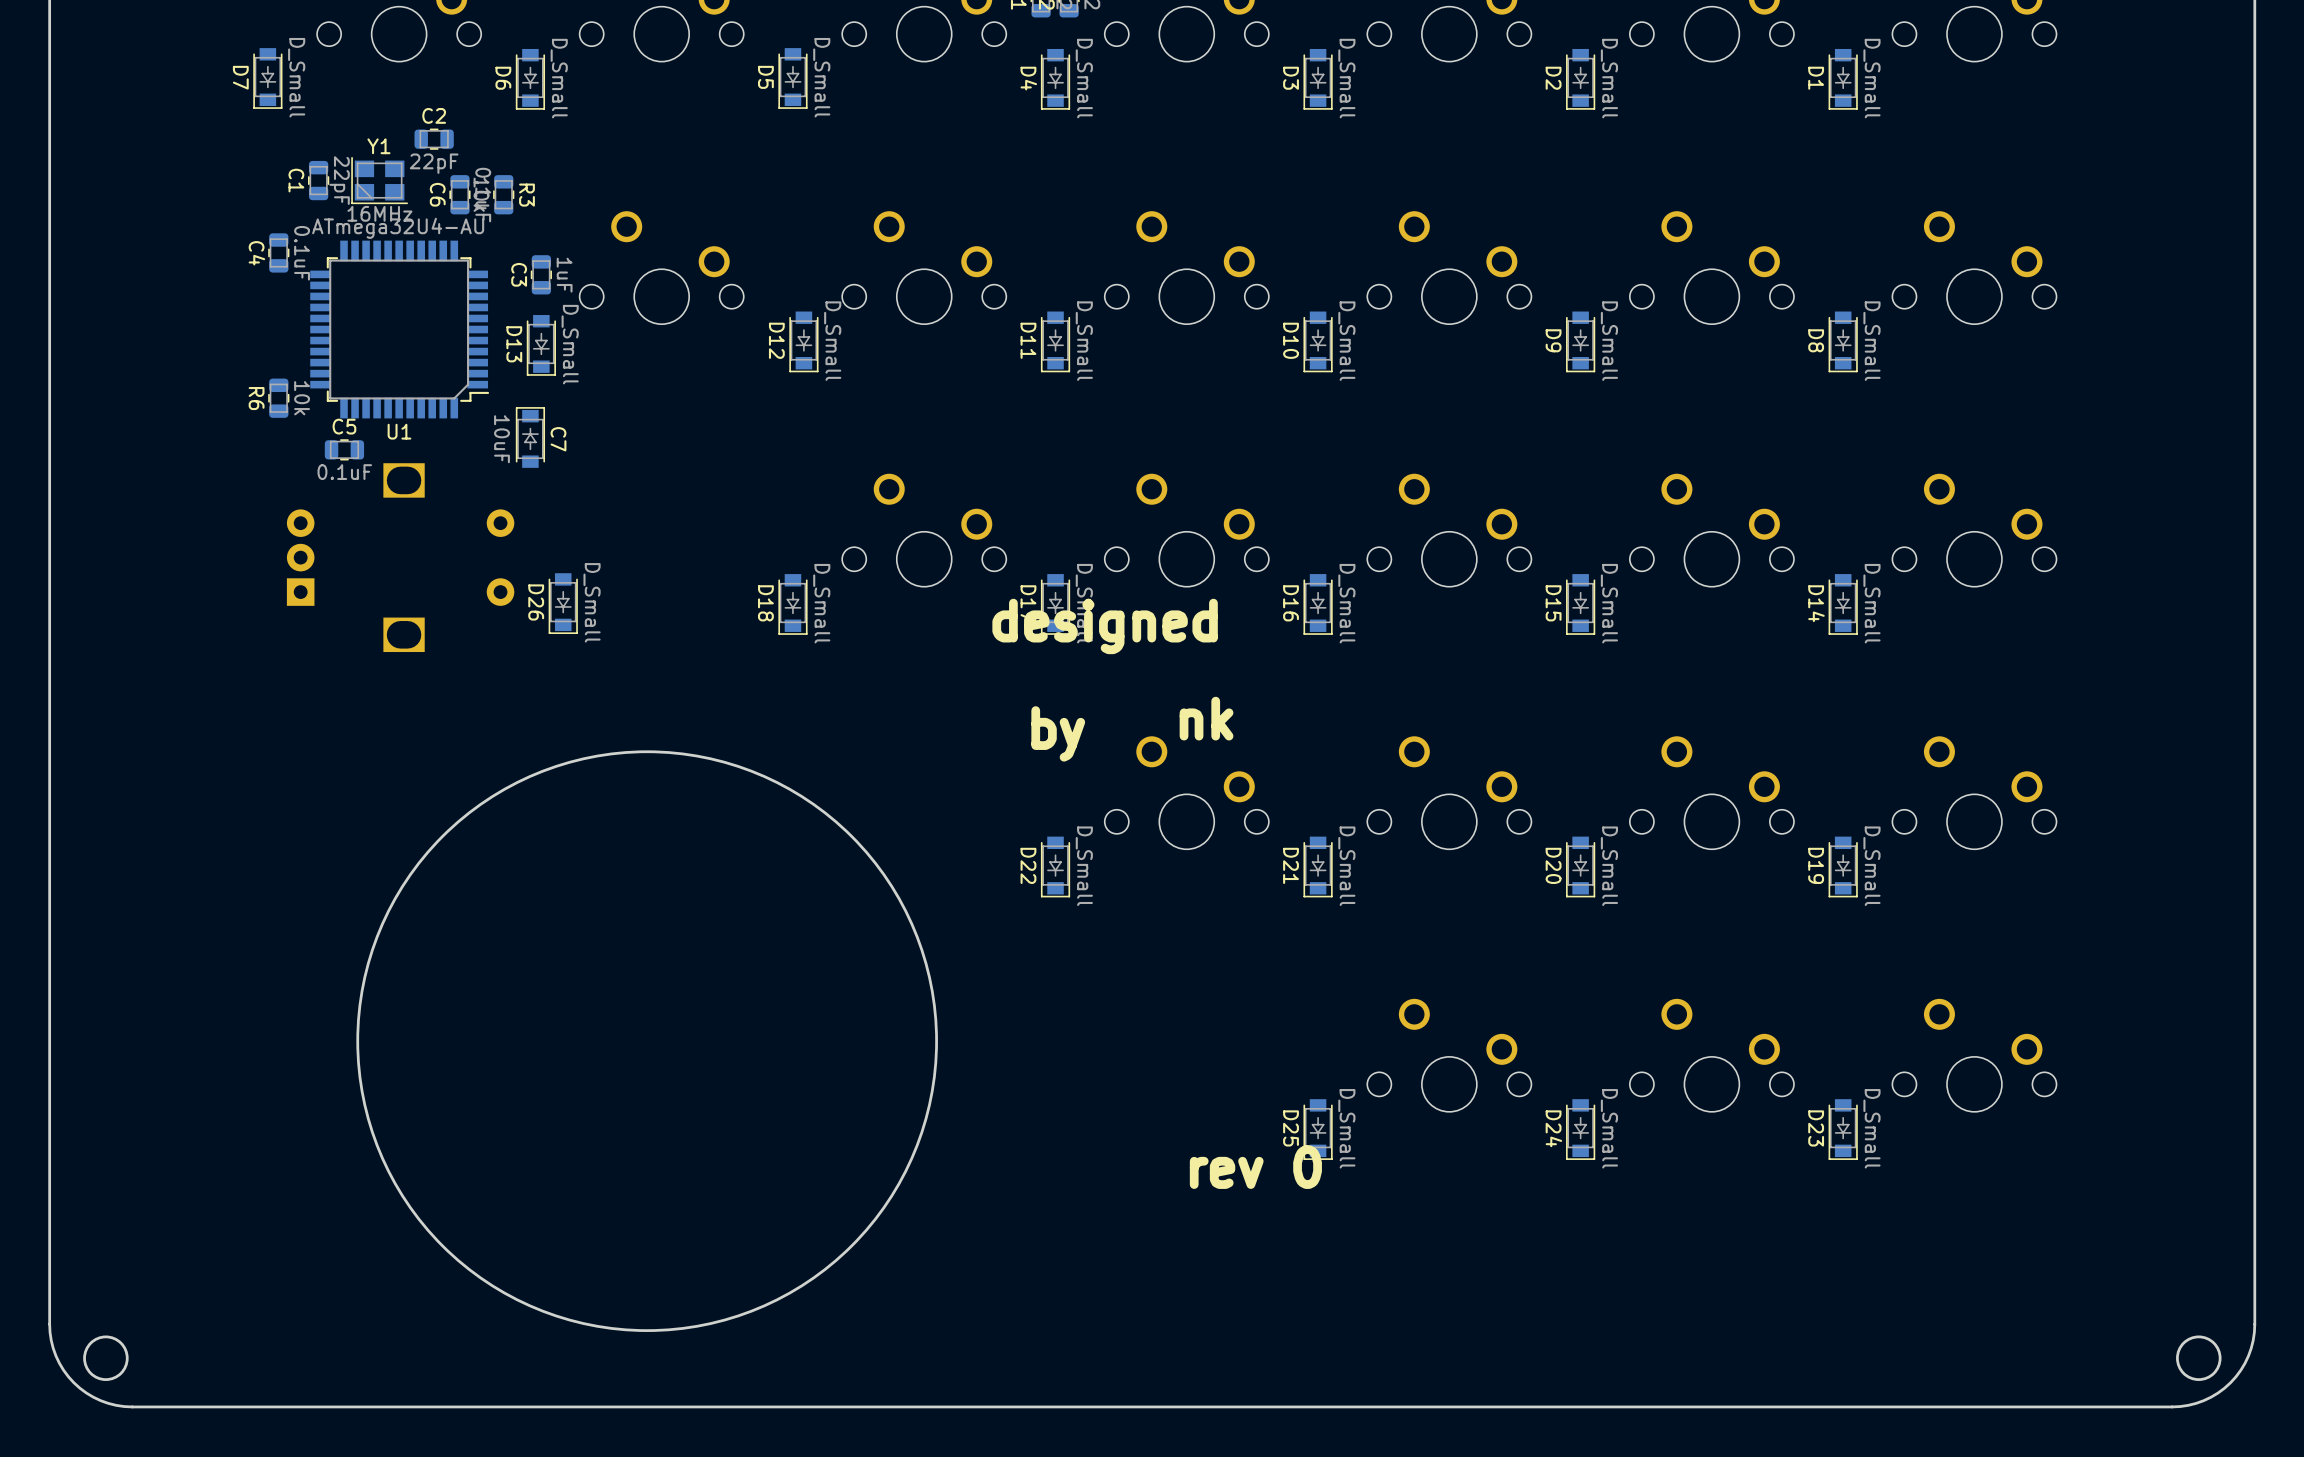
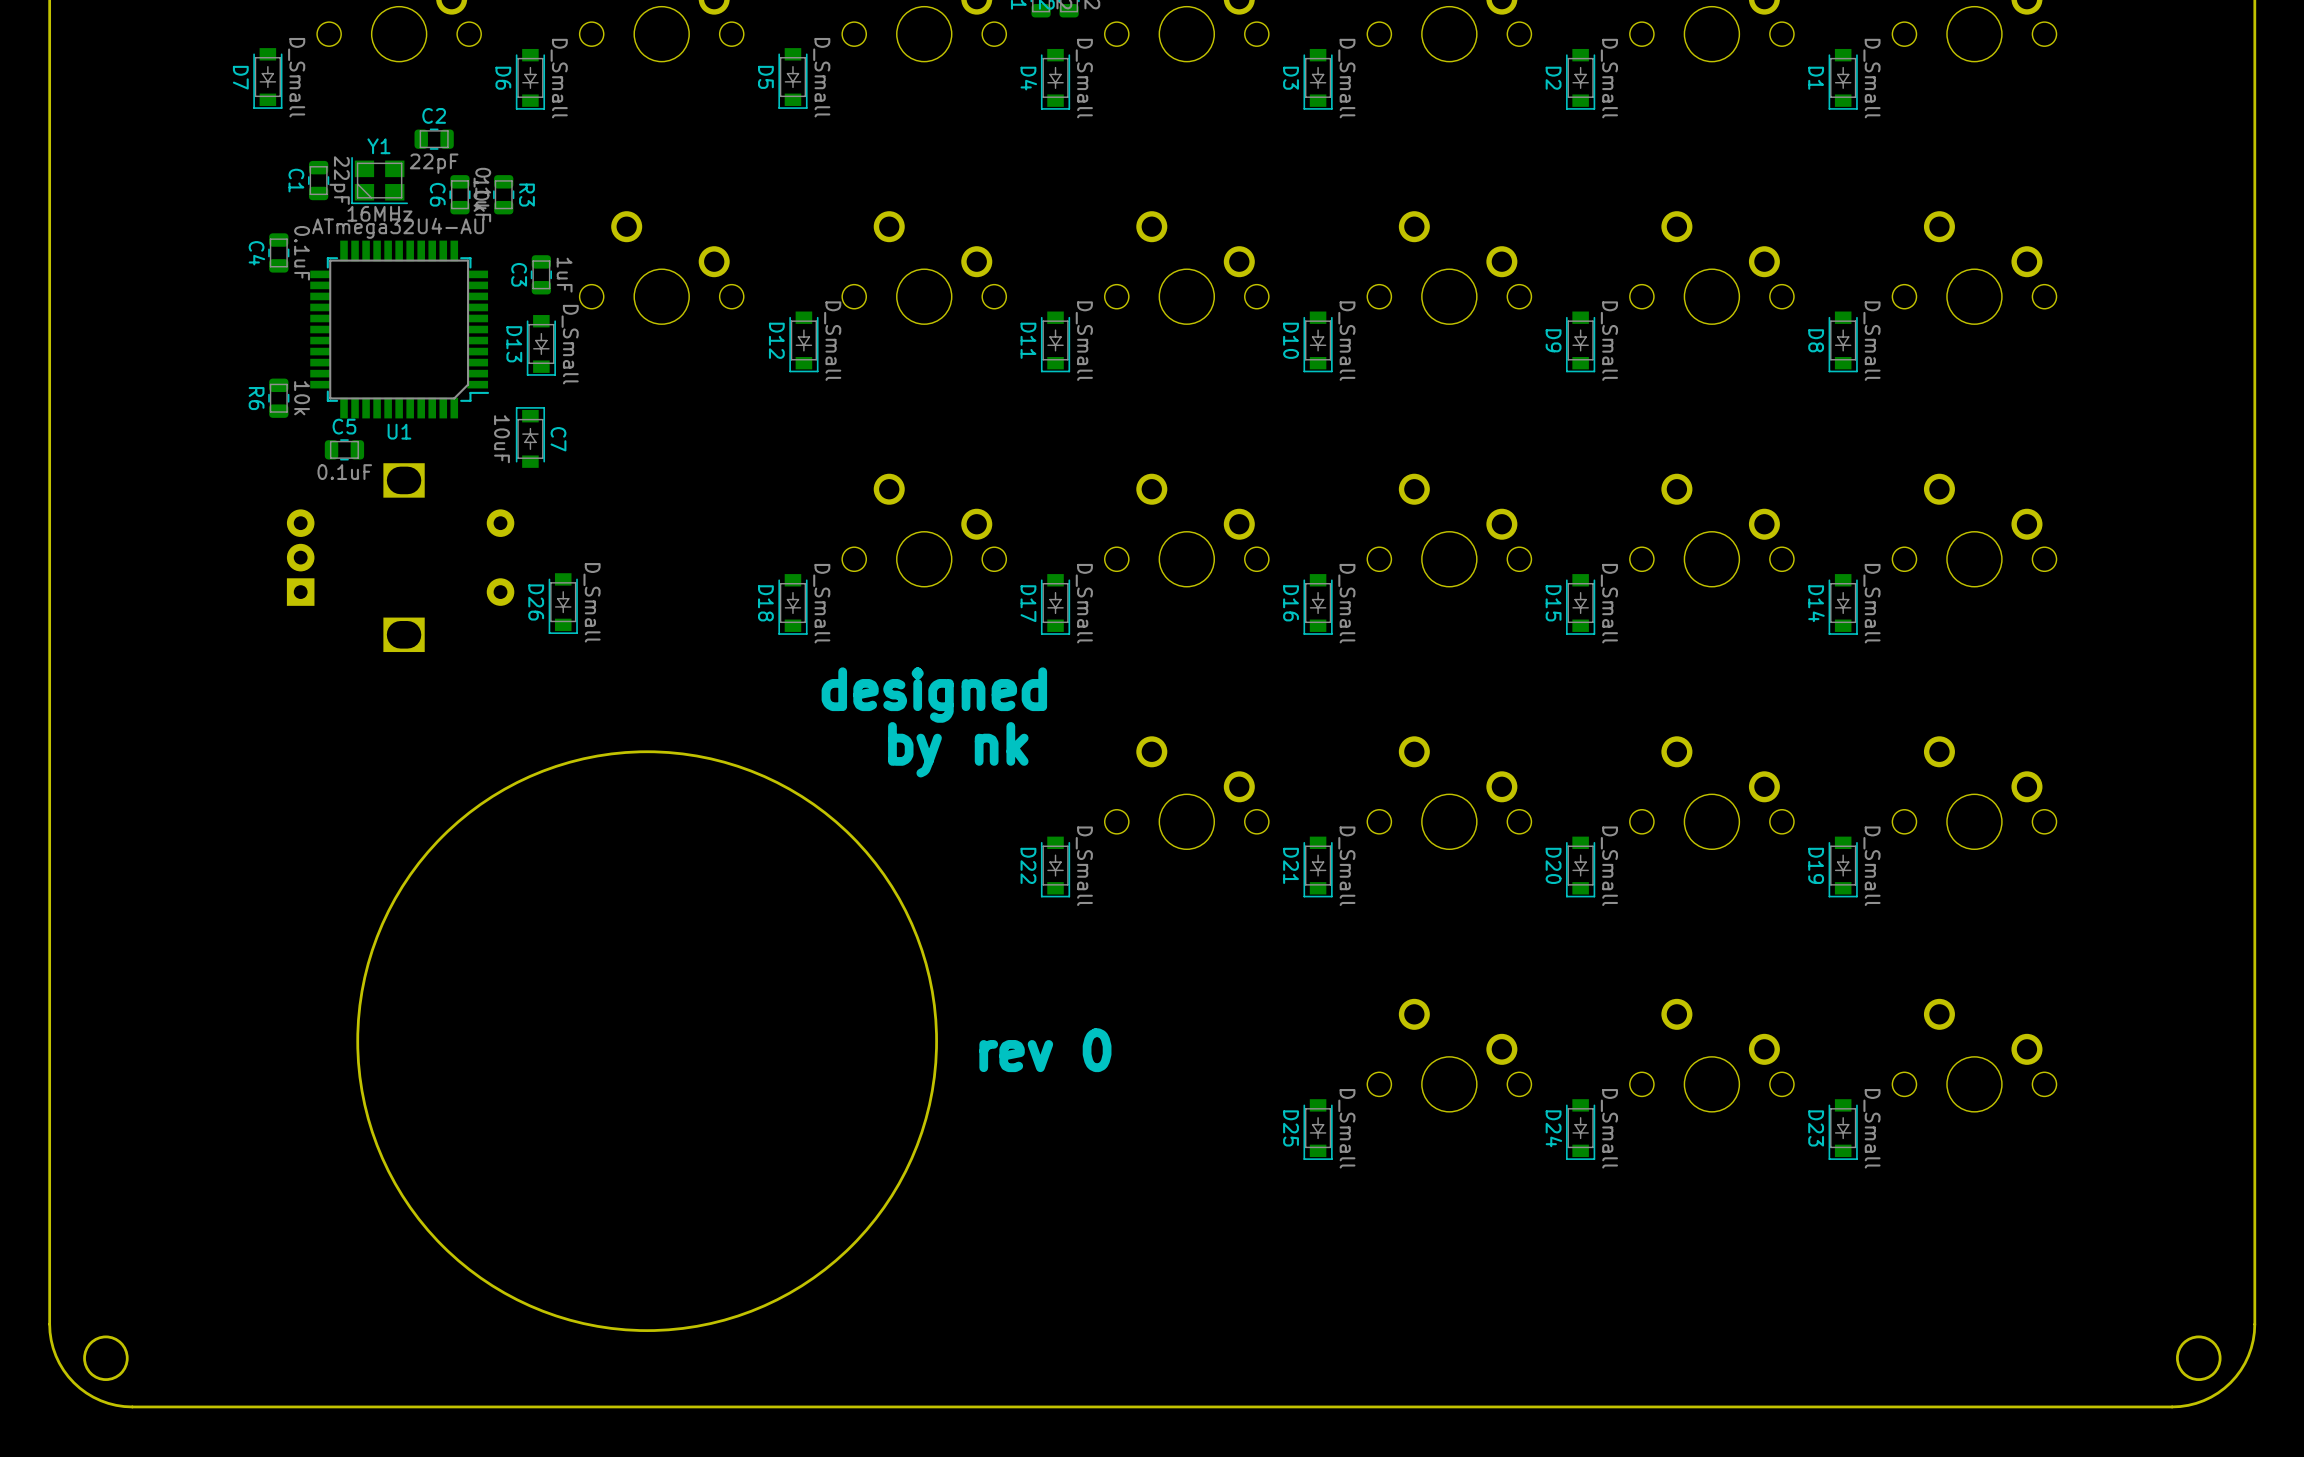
text position: designed (1105, 626) -> designed (934, 695)
text position: nk (1206, 718) -> nk (1001, 743)
text position: by (1058, 733) -> by (914, 749)
text position: rev 0 (1255, 1167) -> rev 0 (1045, 1050)

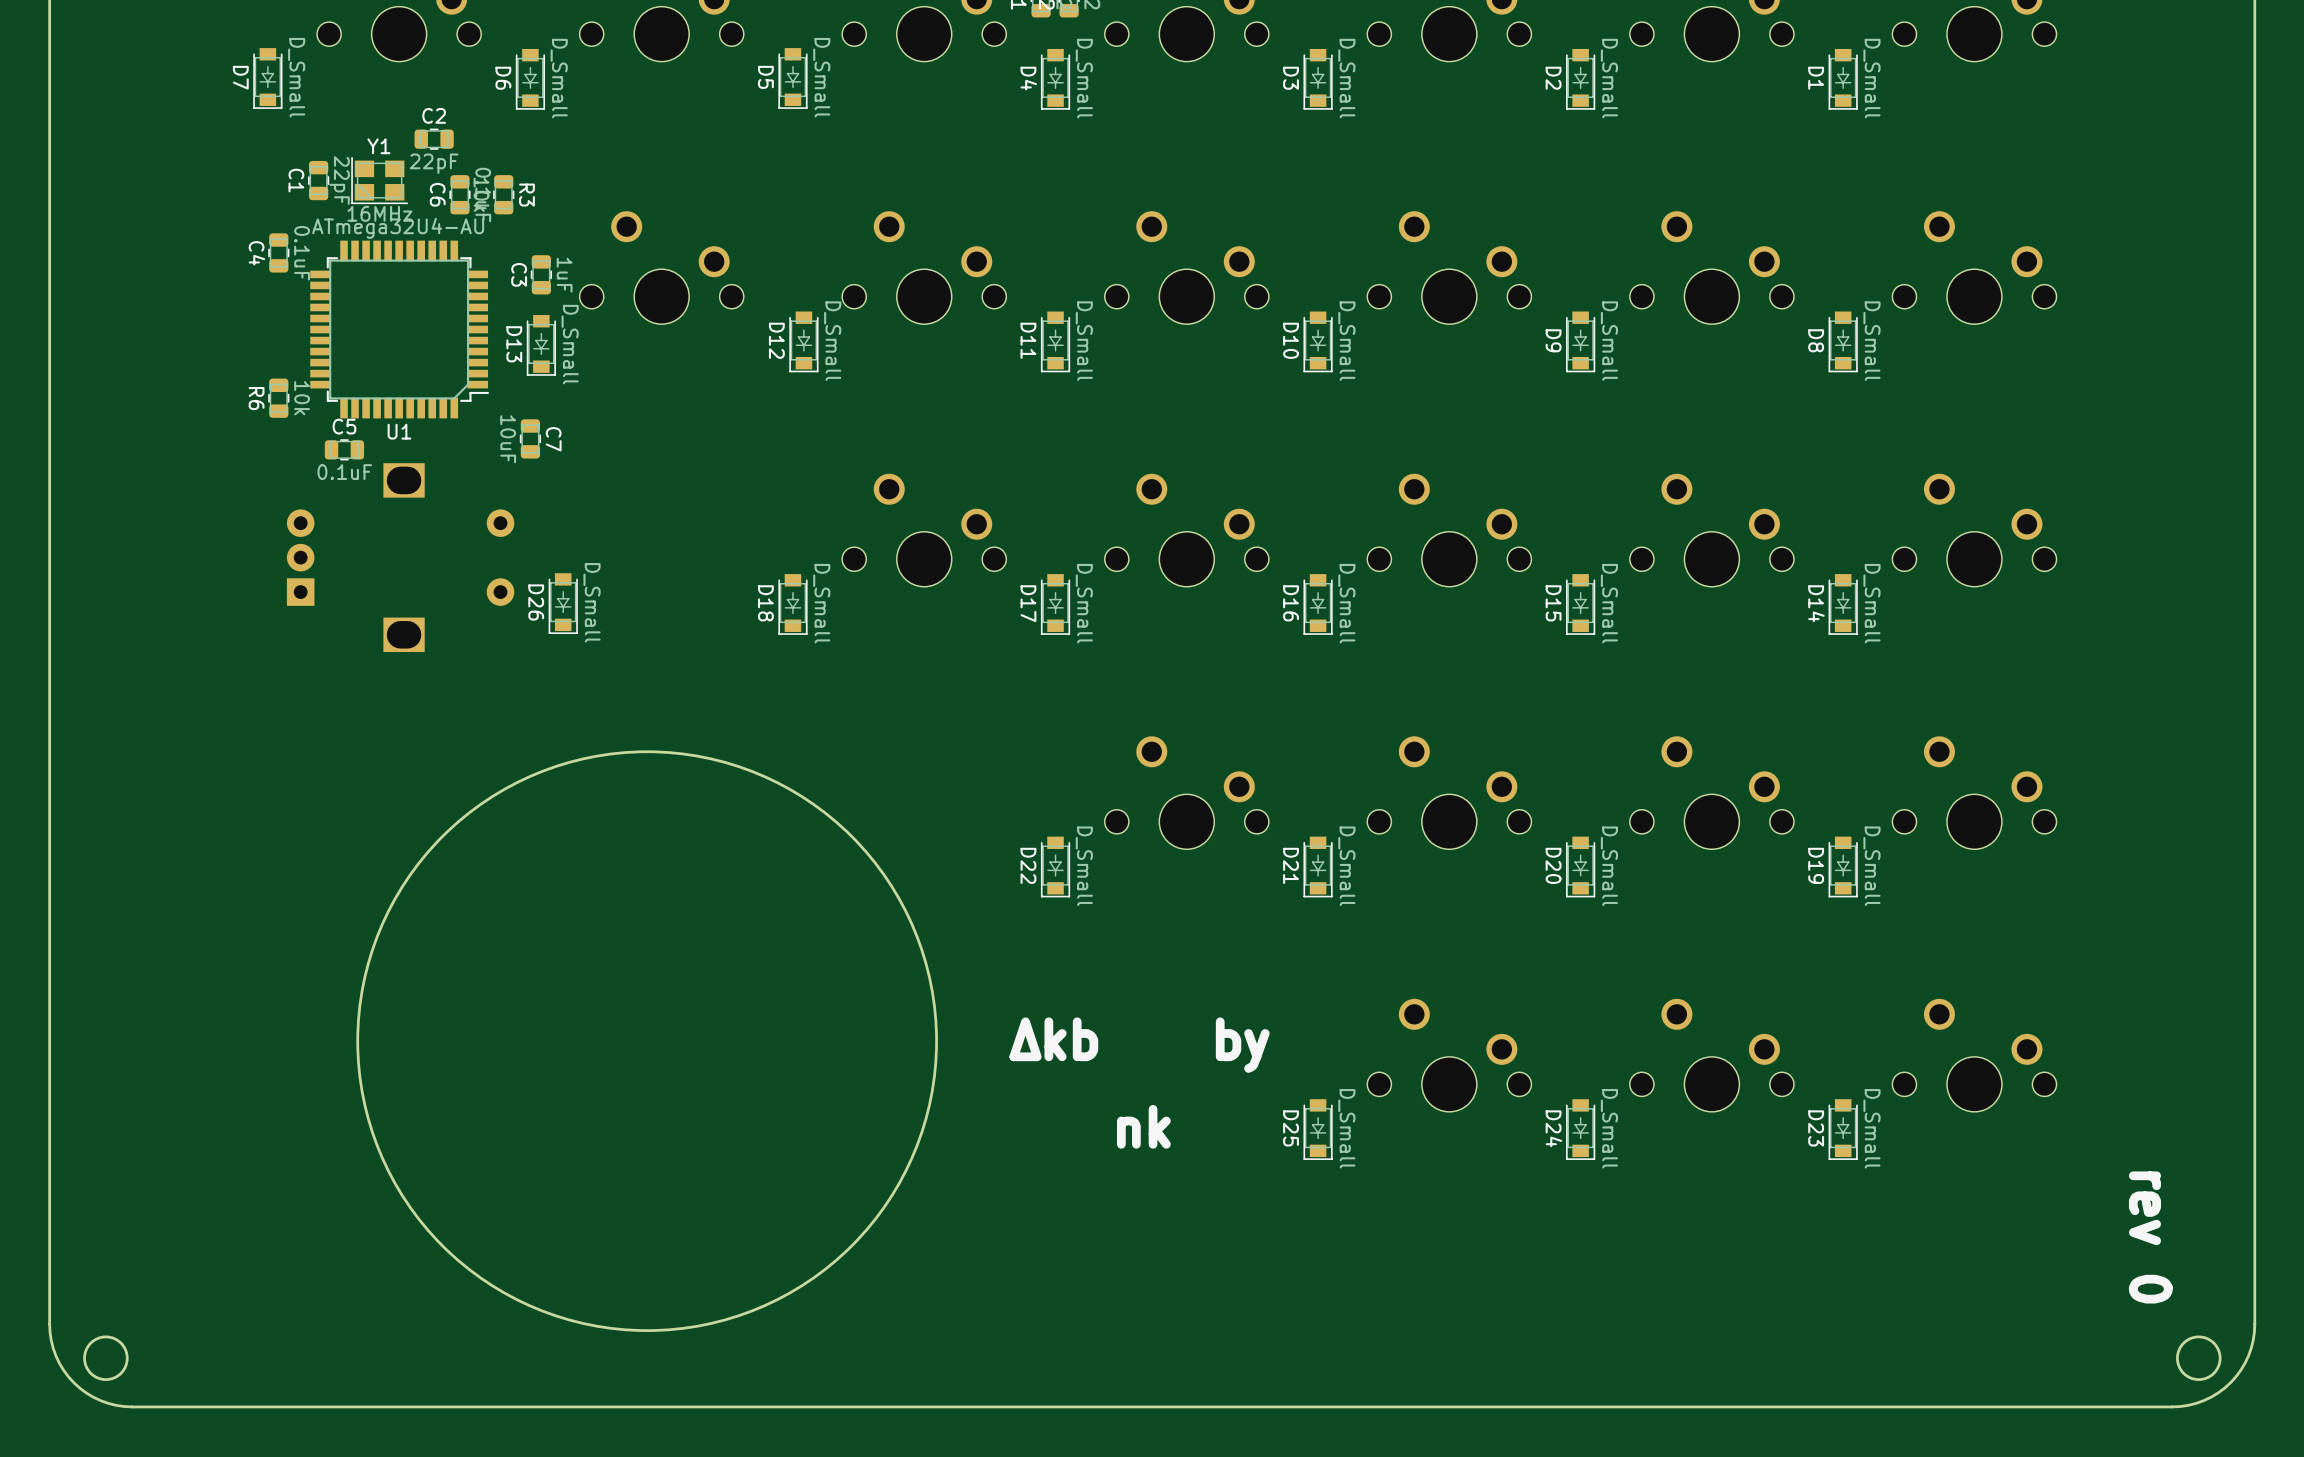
C7 footprint: [515, 407, 546, 468] -> [519, 419, 542, 459]
text: designed (934, 695) -> none
text: nk (1001, 743) -> none
text: by (914, 749) -> none
text: none -> Δkb (1053, 1039)
text: none -> by (1242, 1045)
text: rev 0 (1045, 1050) -> none
text: none -> nk (1143, 1126)
text: none -> rev 0 (2150, 1237)

